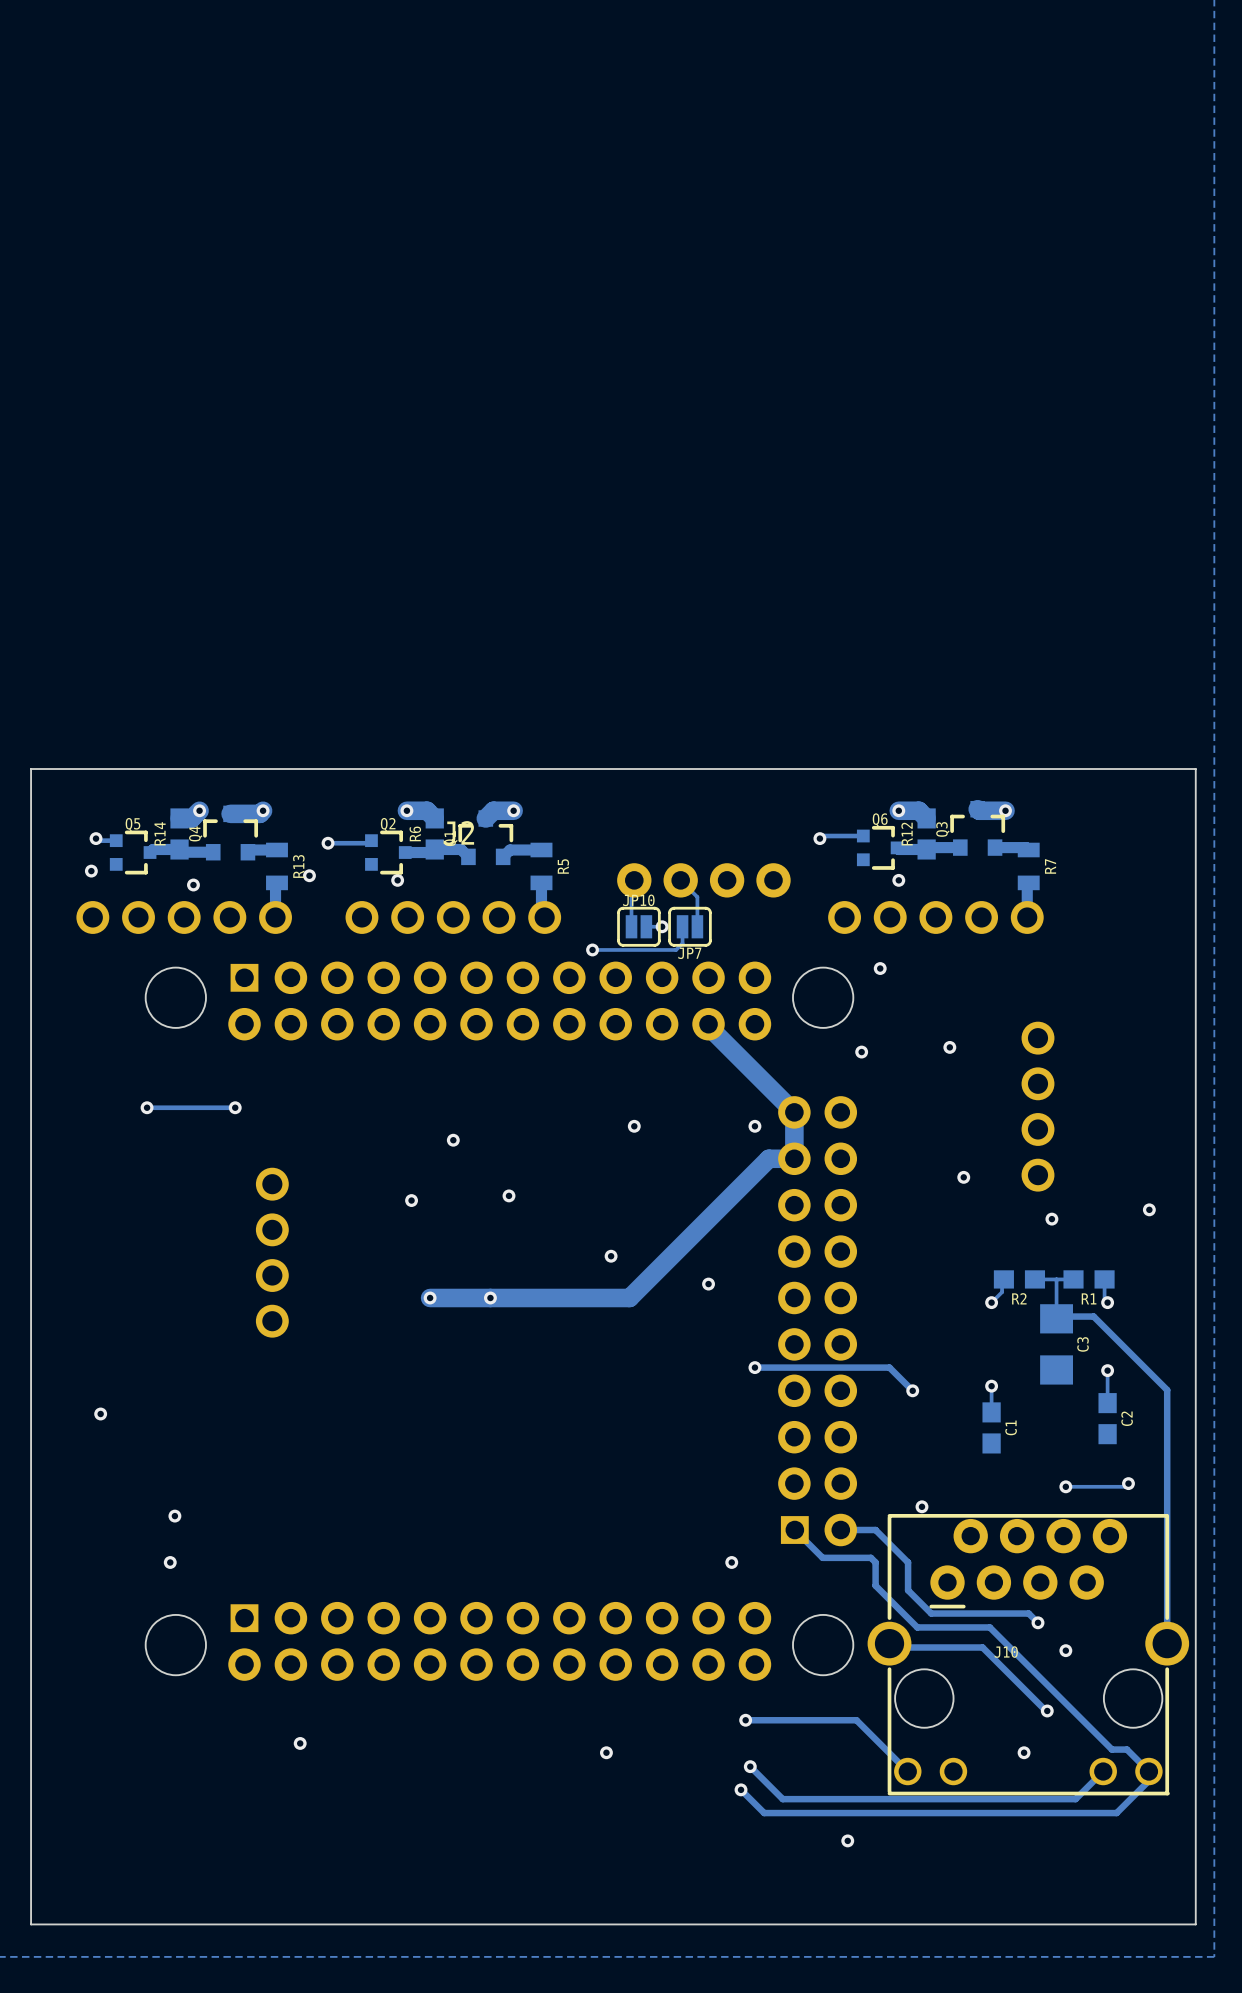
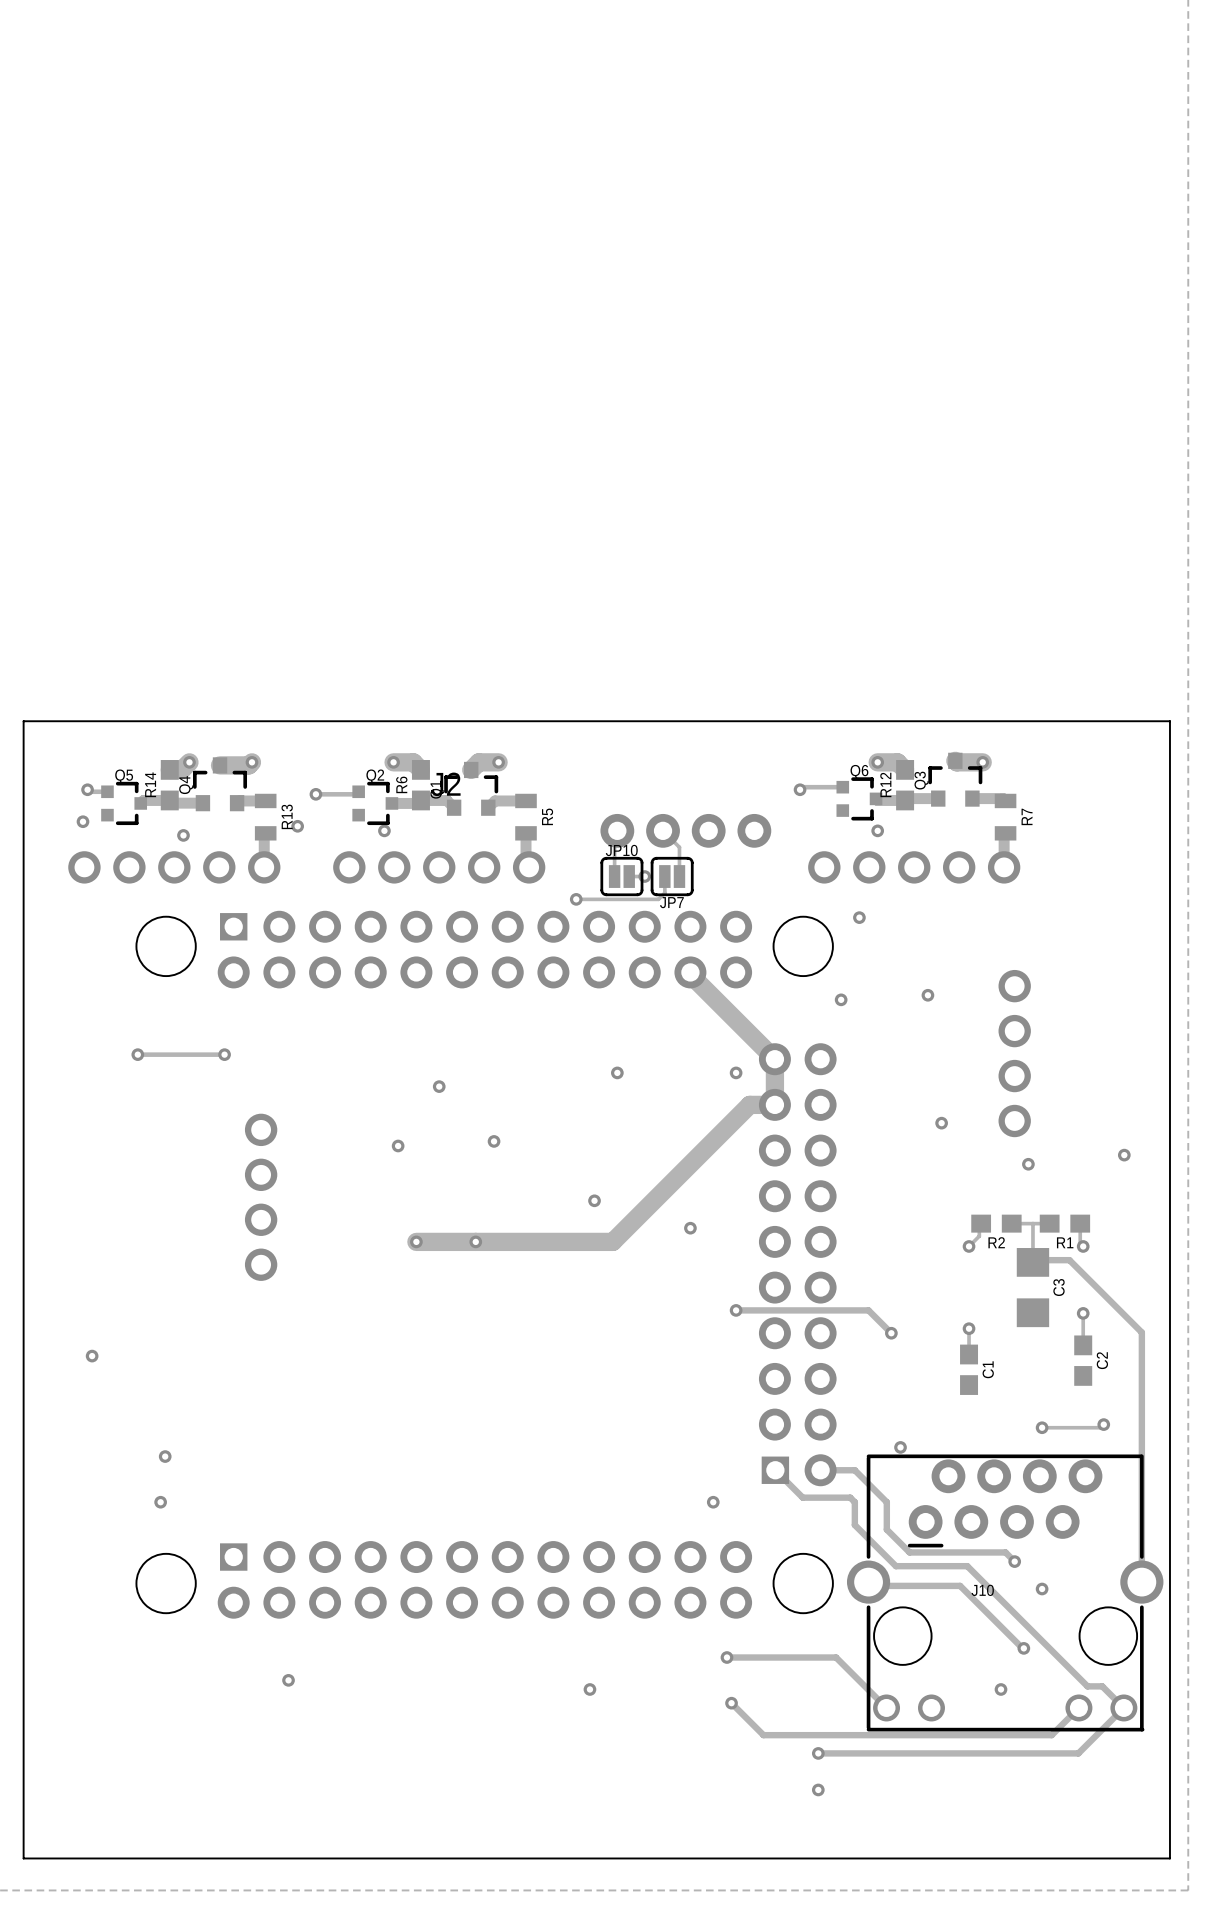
track: (1148, 1771) (1148, 1780) (1116, 1813) (764, 1813) (741, 1789) -> (1123, 1707) (1078, 1753) (818, 1753)
via: (741, 1789) -> none
via: none -> (818, 1753)
via: (847, 1840) -> none
via: none -> (818, 1789)

